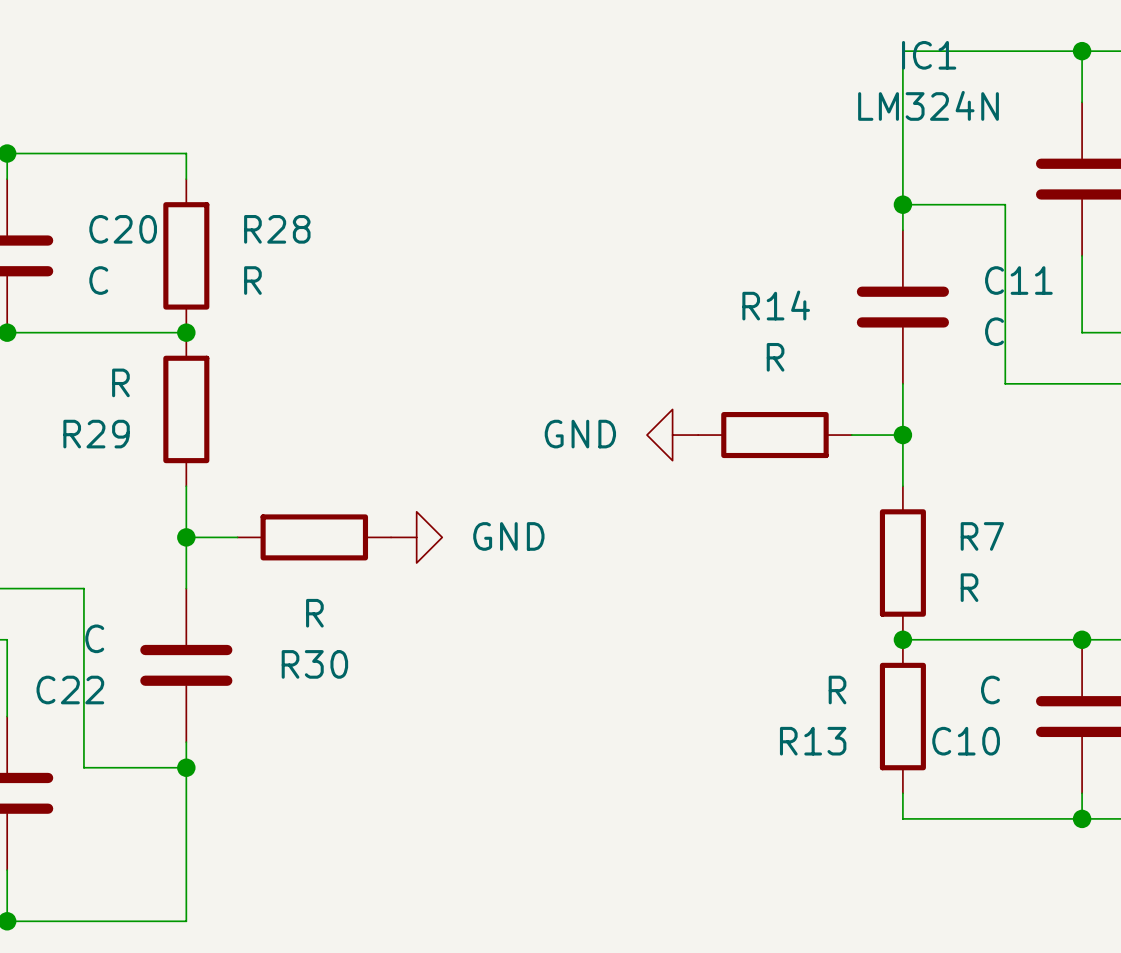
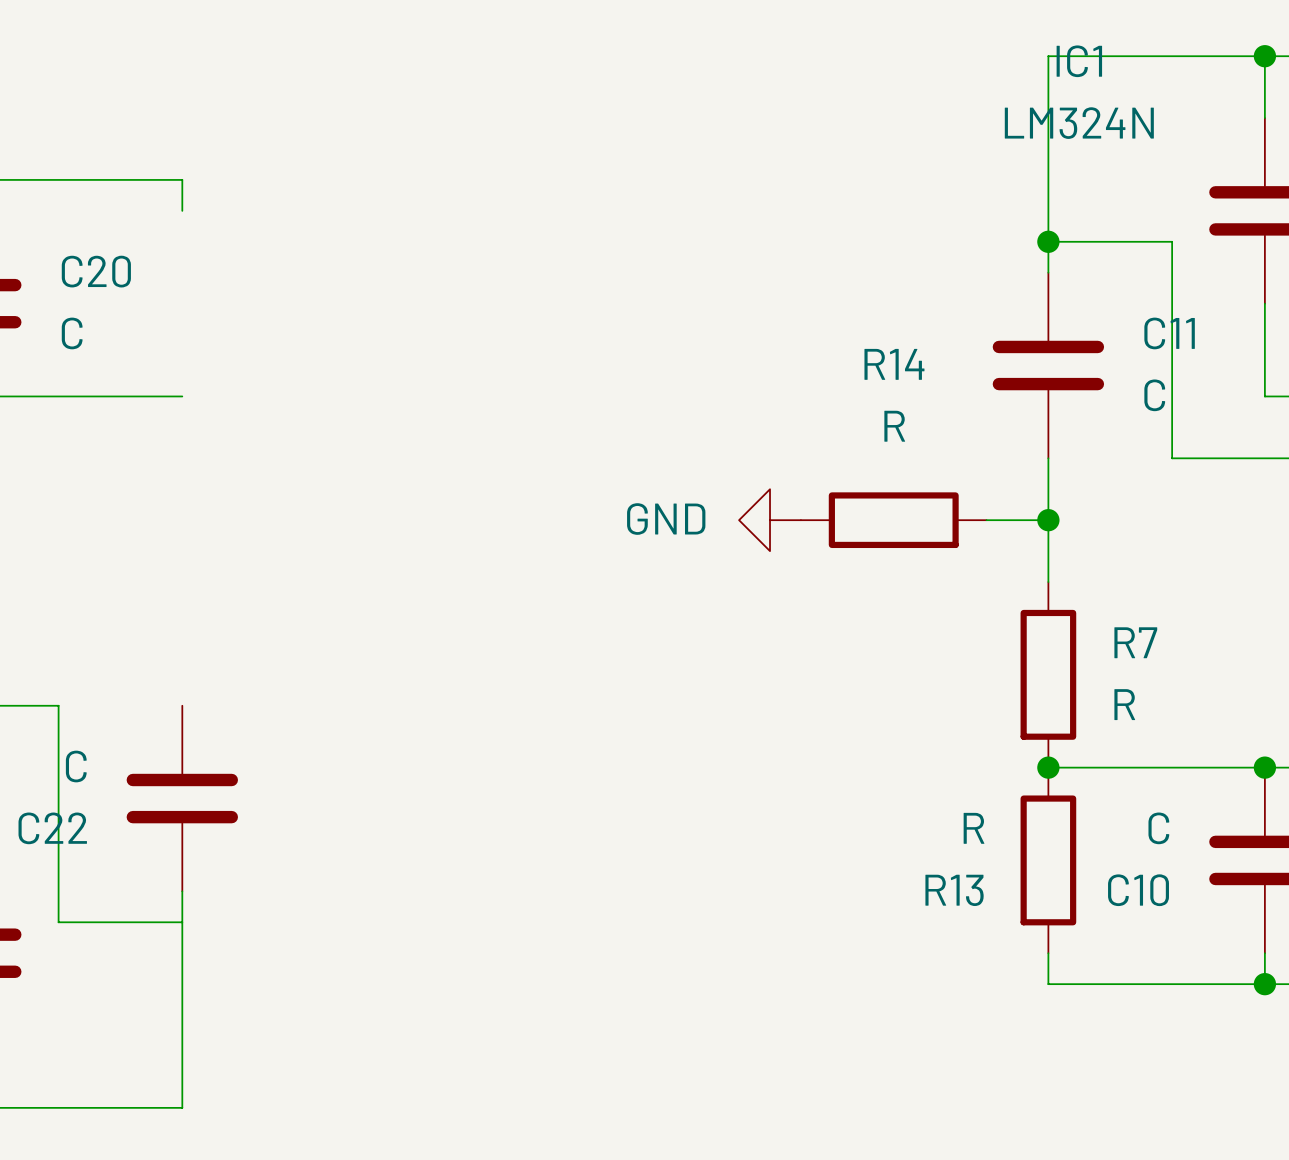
R28: R (186, 255) -> none
junction: (186, 332) -> none
R29: R (186, 409) -> none
wire: (186, 486) (186, 588) -> none
wire: (186, 537) (237, 537) -> none
junction: (186, 537) -> none
R30: R (314, 537) -> none
power symbol: GND (416, 537) -> none
junction: (186, 767) -> none

